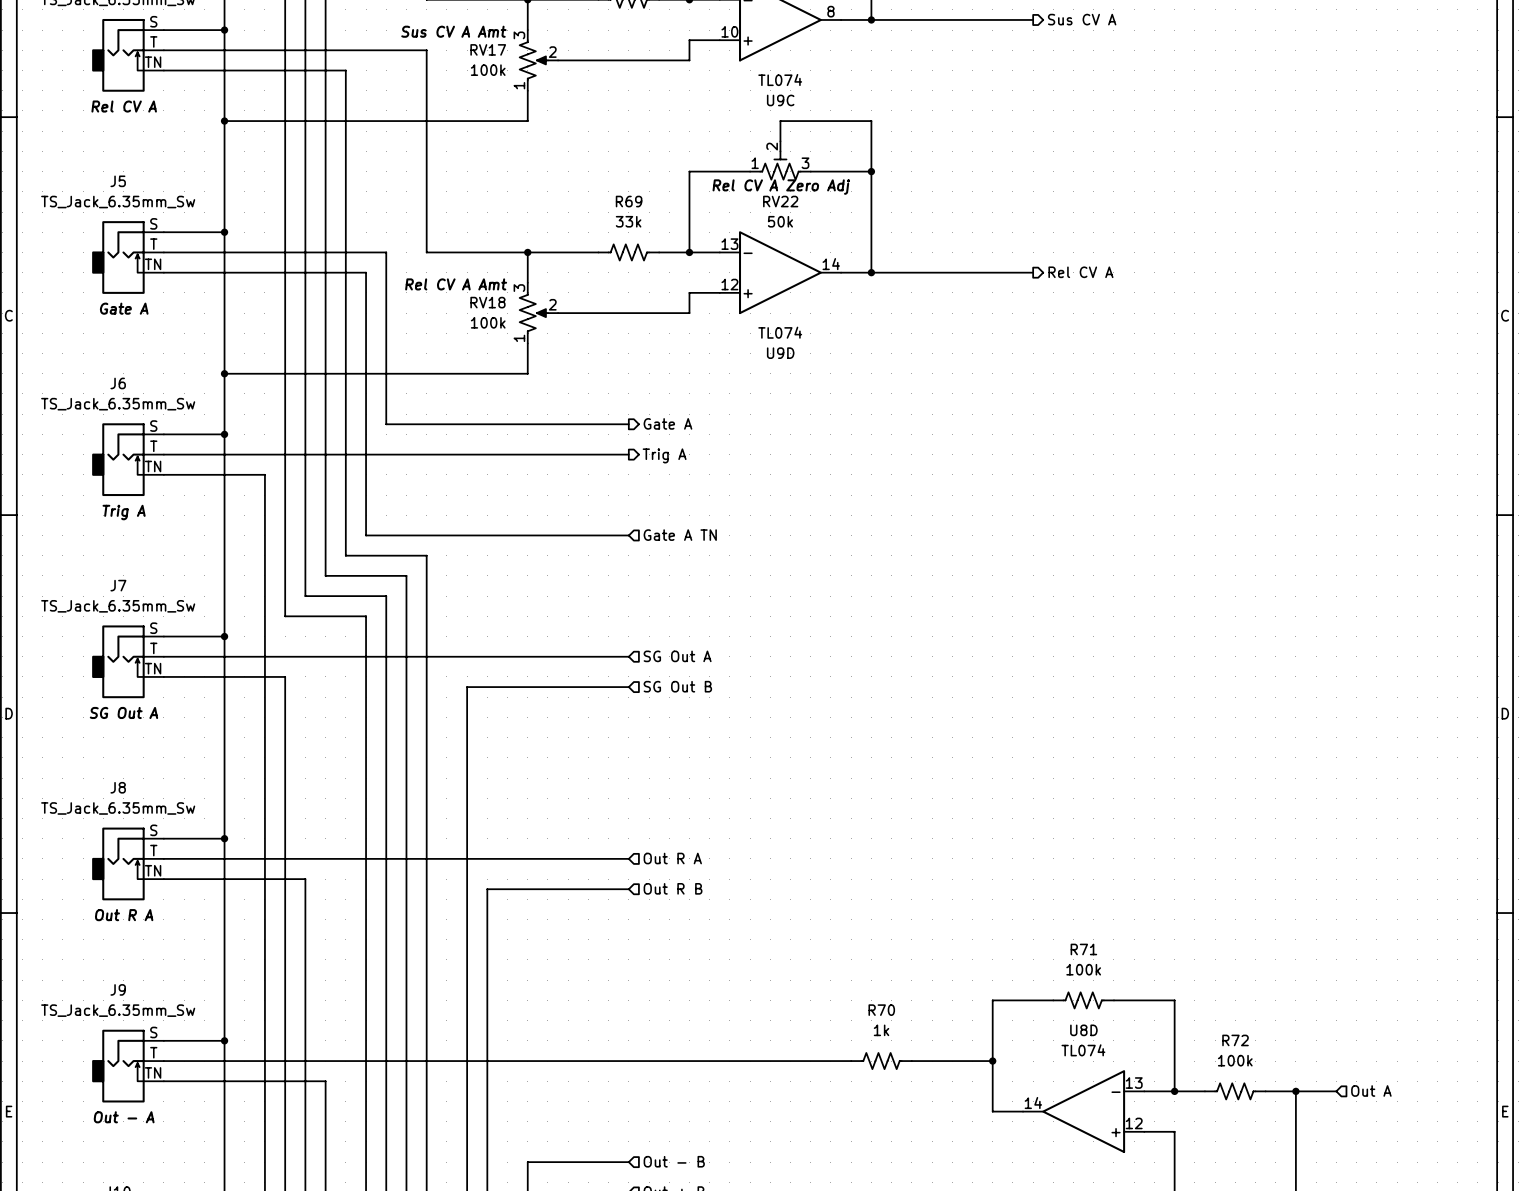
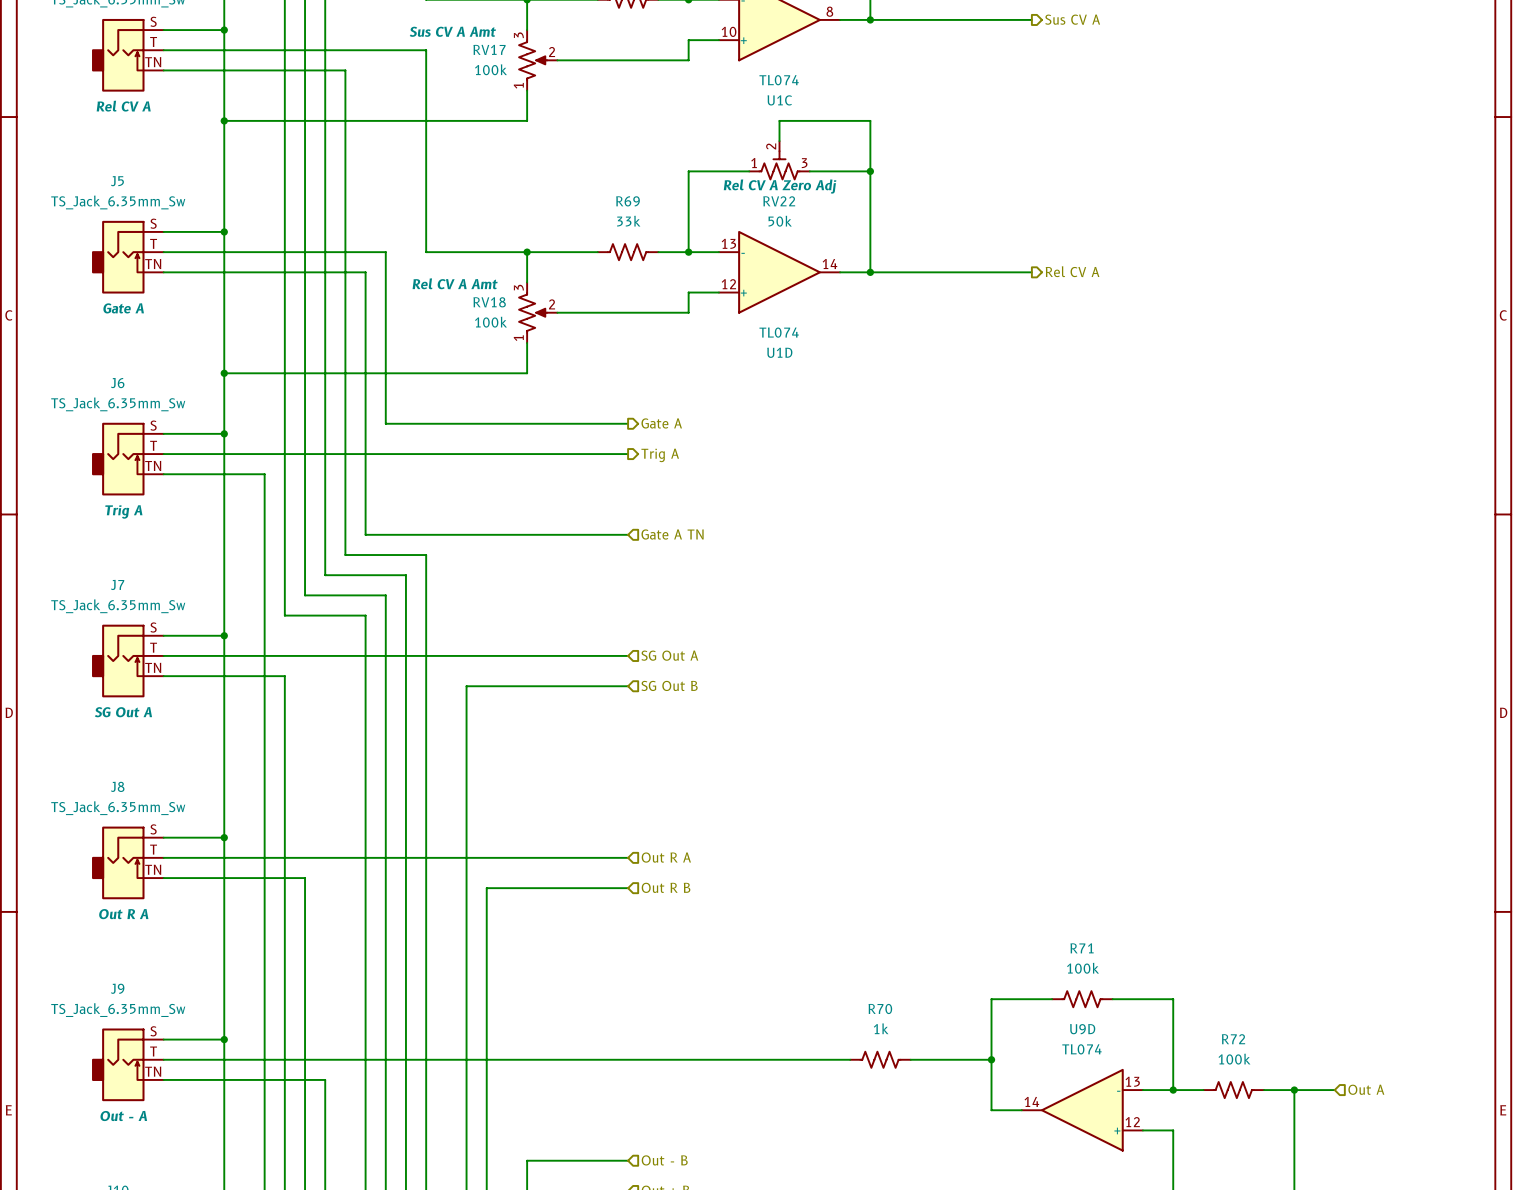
U9C name: U9C (780, 100) -> U1C (779, 100)
U9D name: U9D (780, 353) -> U1D (779, 352)
U8D name: U8D (1083, 1030) -> U9D (1082, 1029)

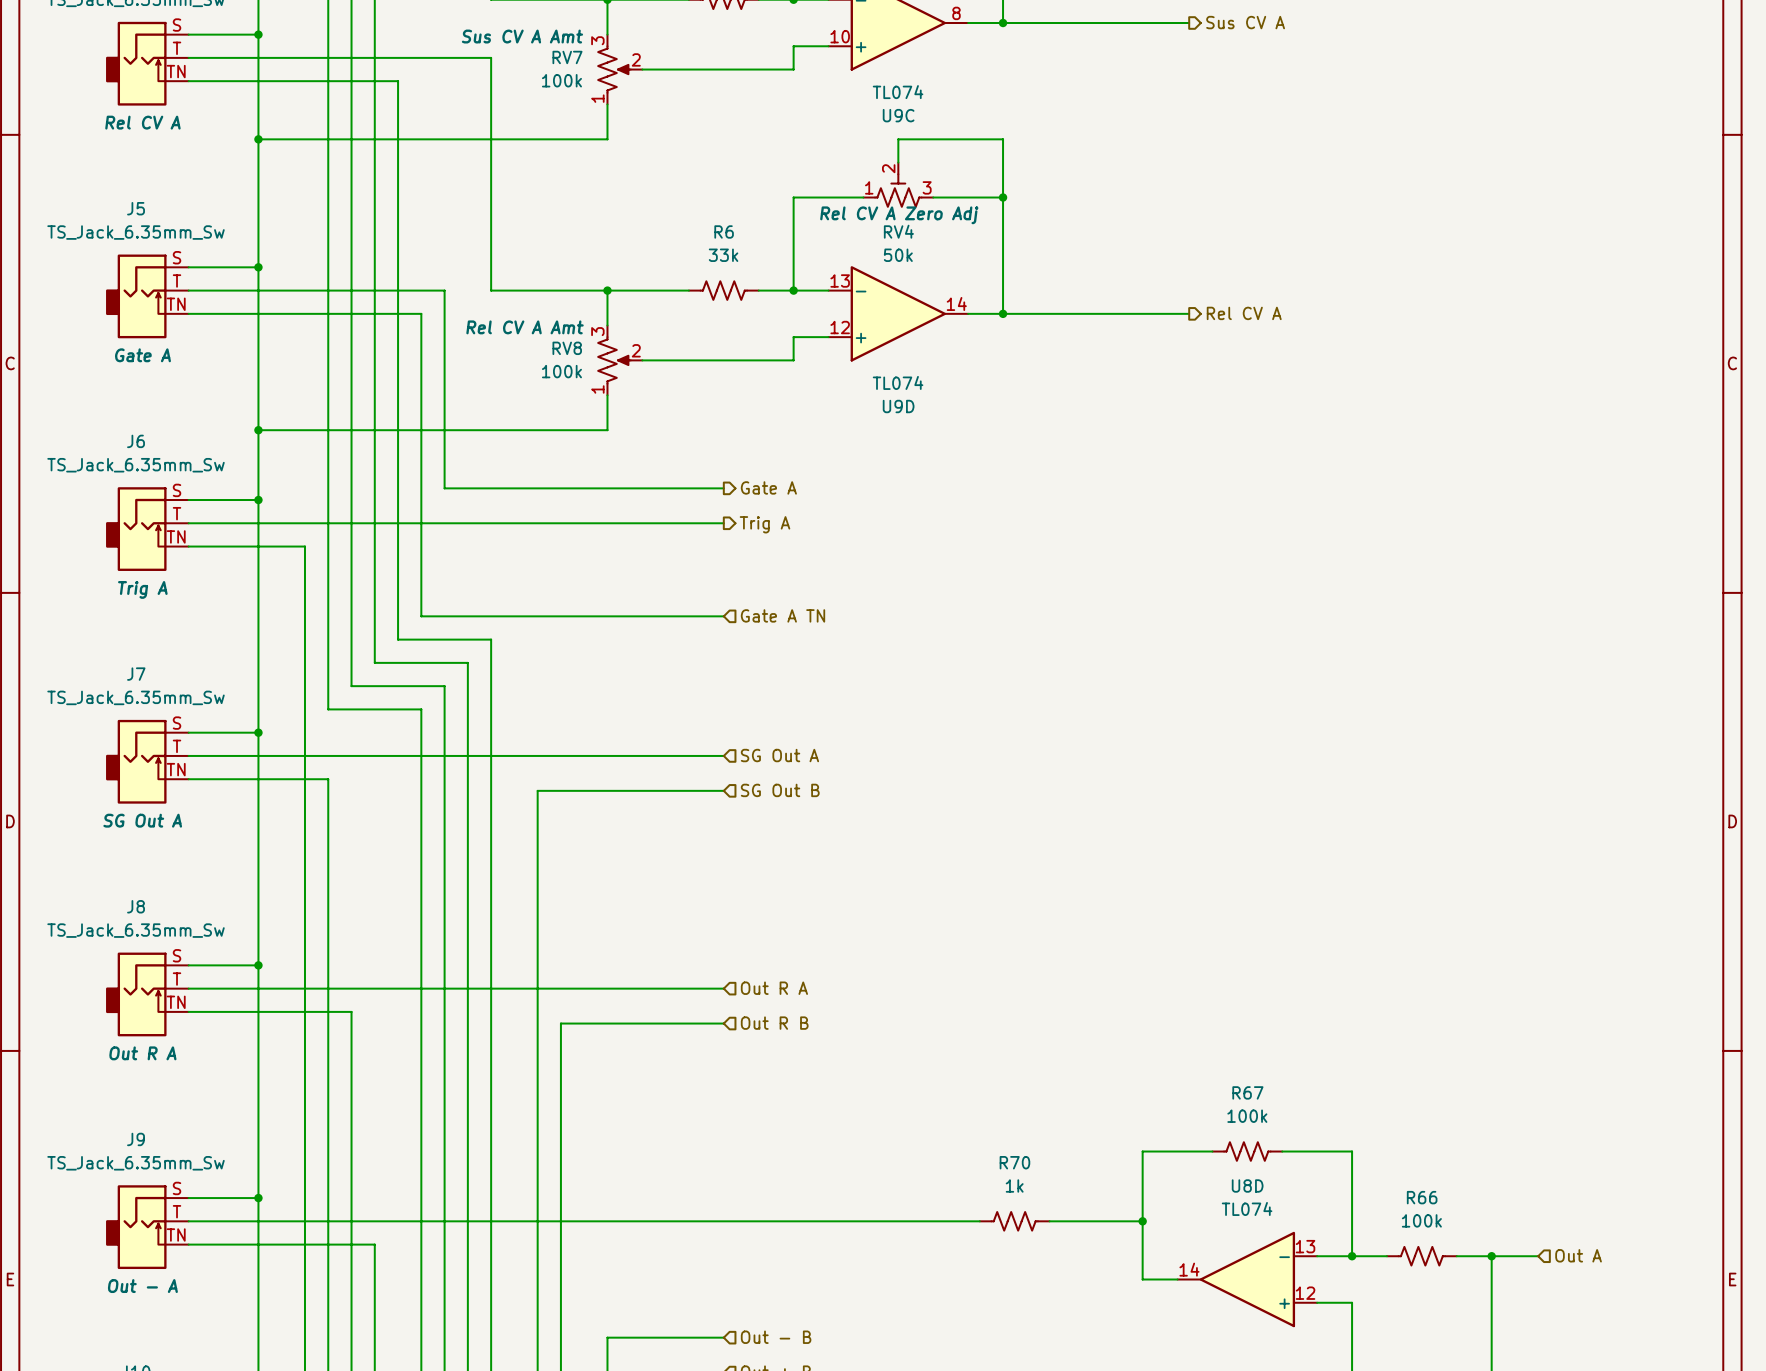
RV17 name: RV17 (489, 49) -> RV7 (567, 57)
U1C name: U1C (779, 100) -> U9C (898, 115)
R69 name: R69 (628, 201) -> R6 (724, 231)
RV22 name: RV22 (779, 201) -> RV4 (898, 231)
RV18 name: RV18 (489, 302) -> RV8 (567, 348)
U1D name: U1D (779, 352) -> U9D (898, 406)
R71 name: R71 (1082, 948) -> R67 (1247, 1092)
U9D name: U9D (1082, 1029) -> U8D (1247, 1185)
R72 name: R72 (1233, 1039) -> R66 (1422, 1197)

